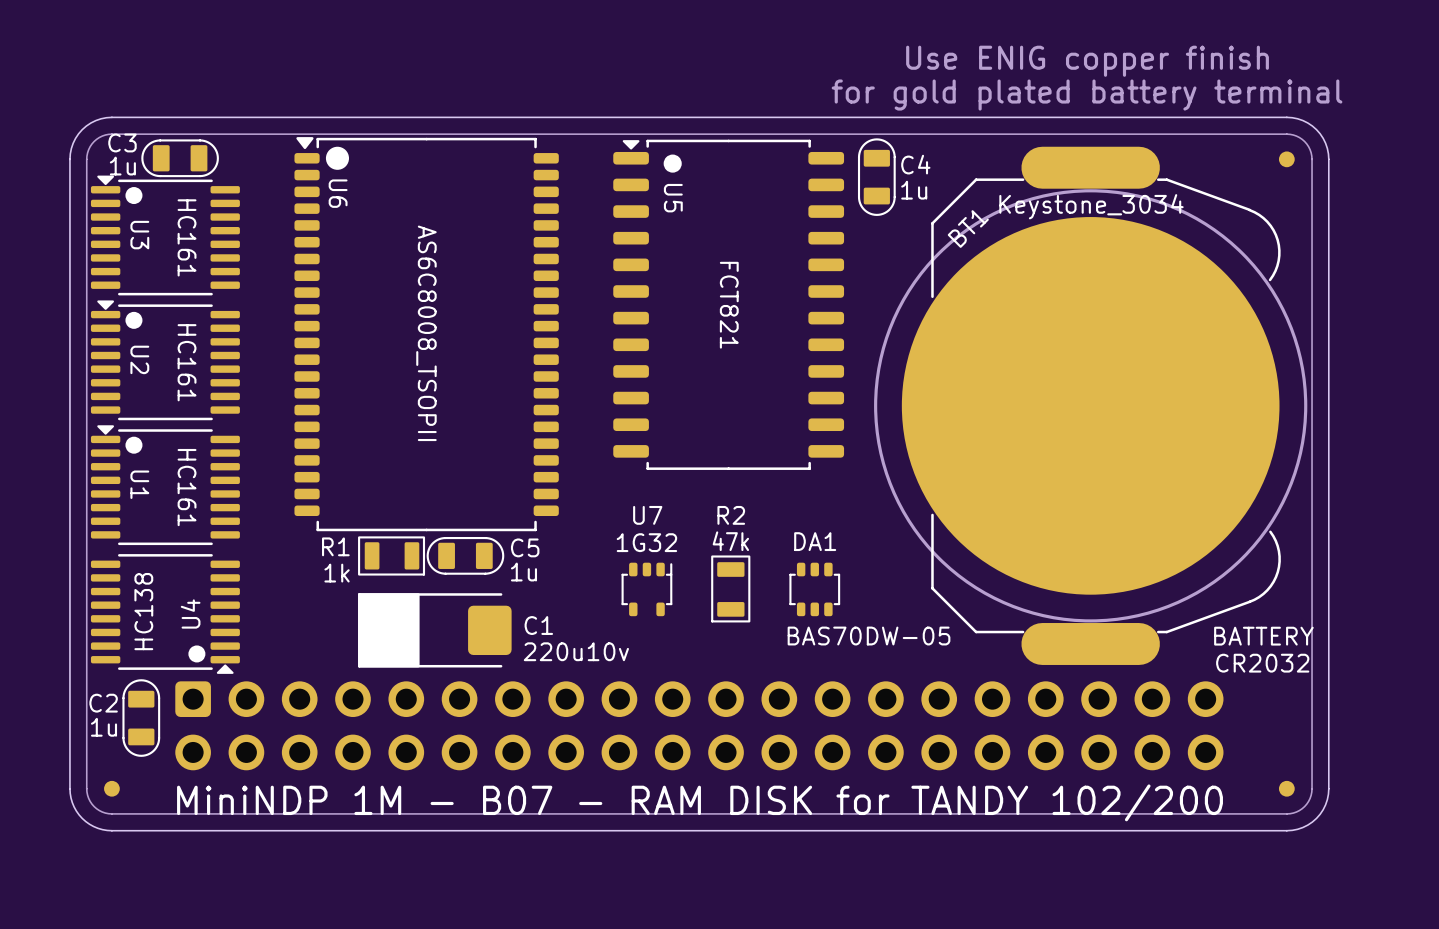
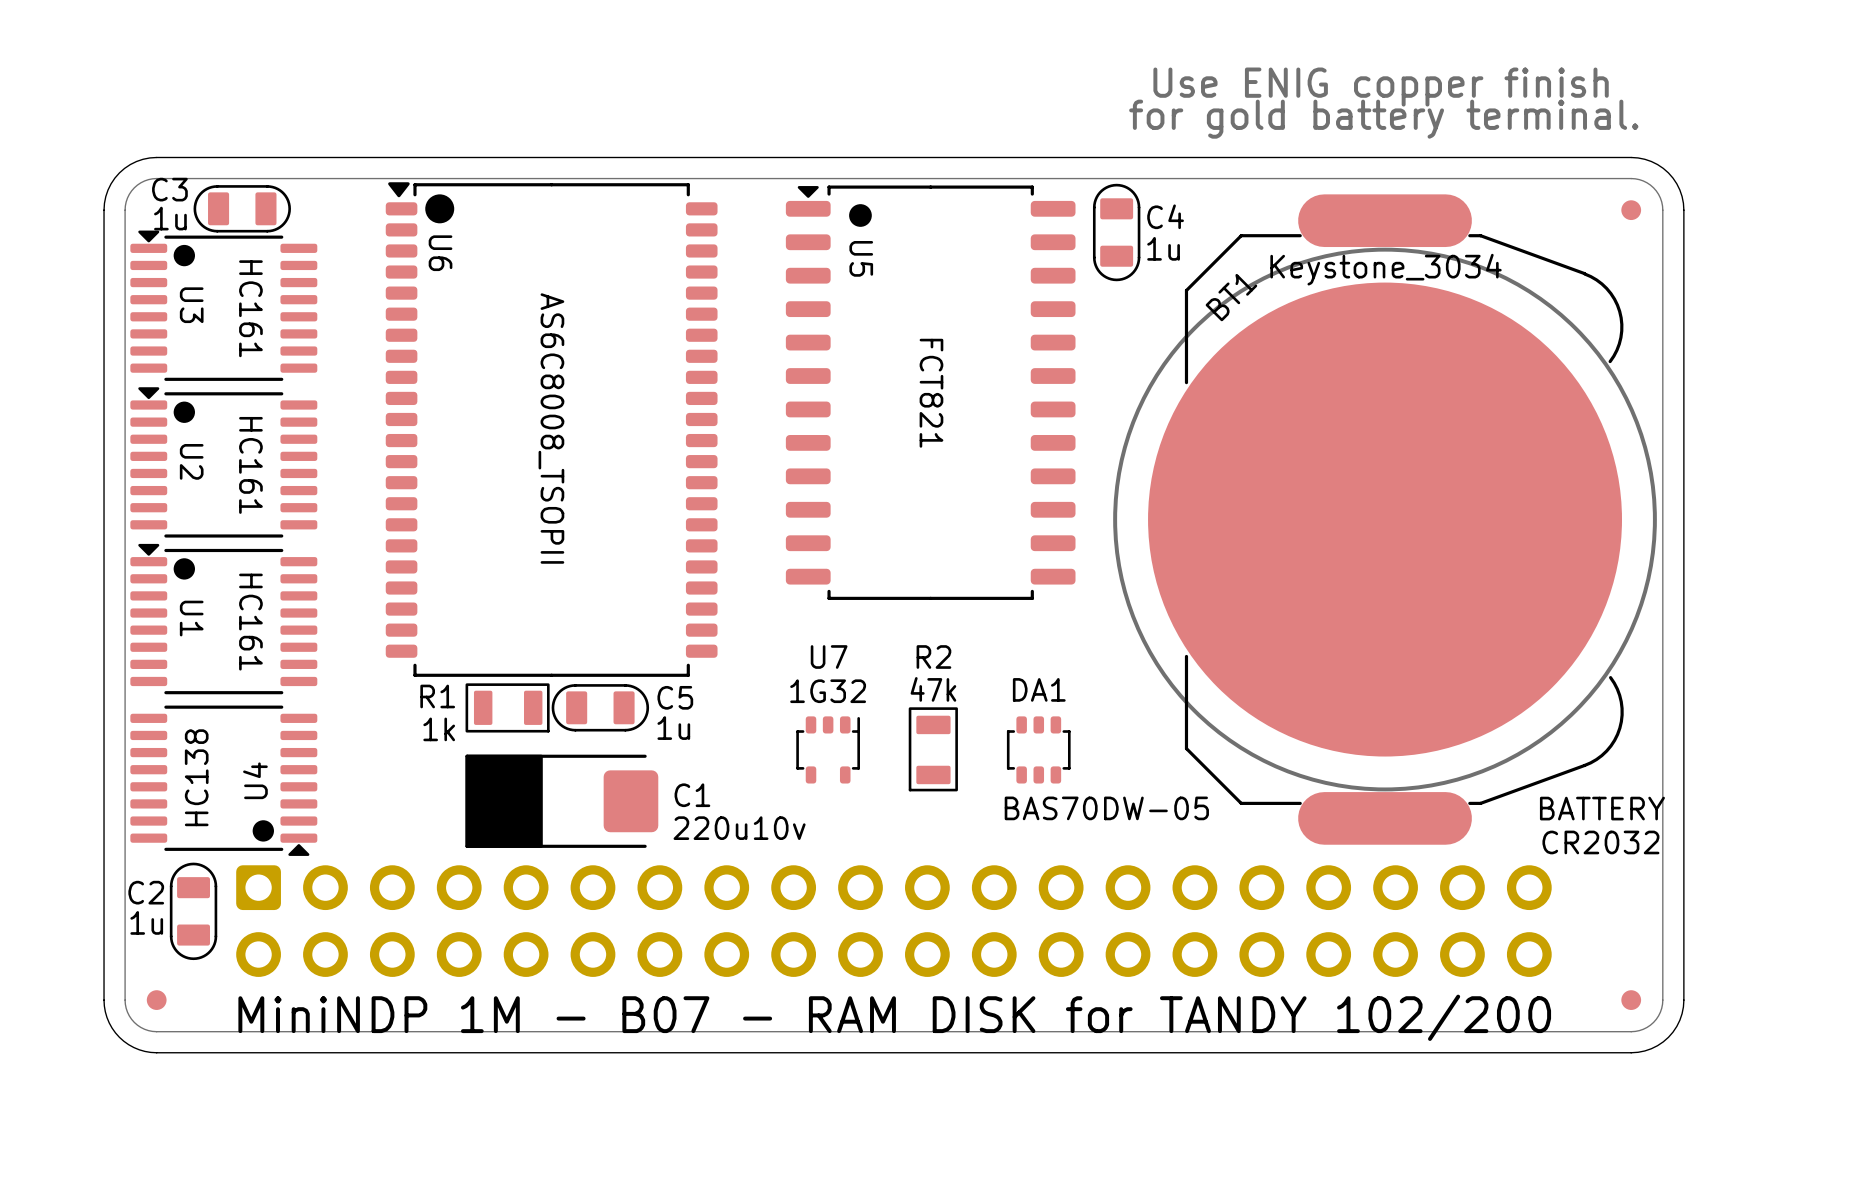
text: for gold plated battery terminal (1087, 95) -> for gold battery terminal. (1383, 119)

